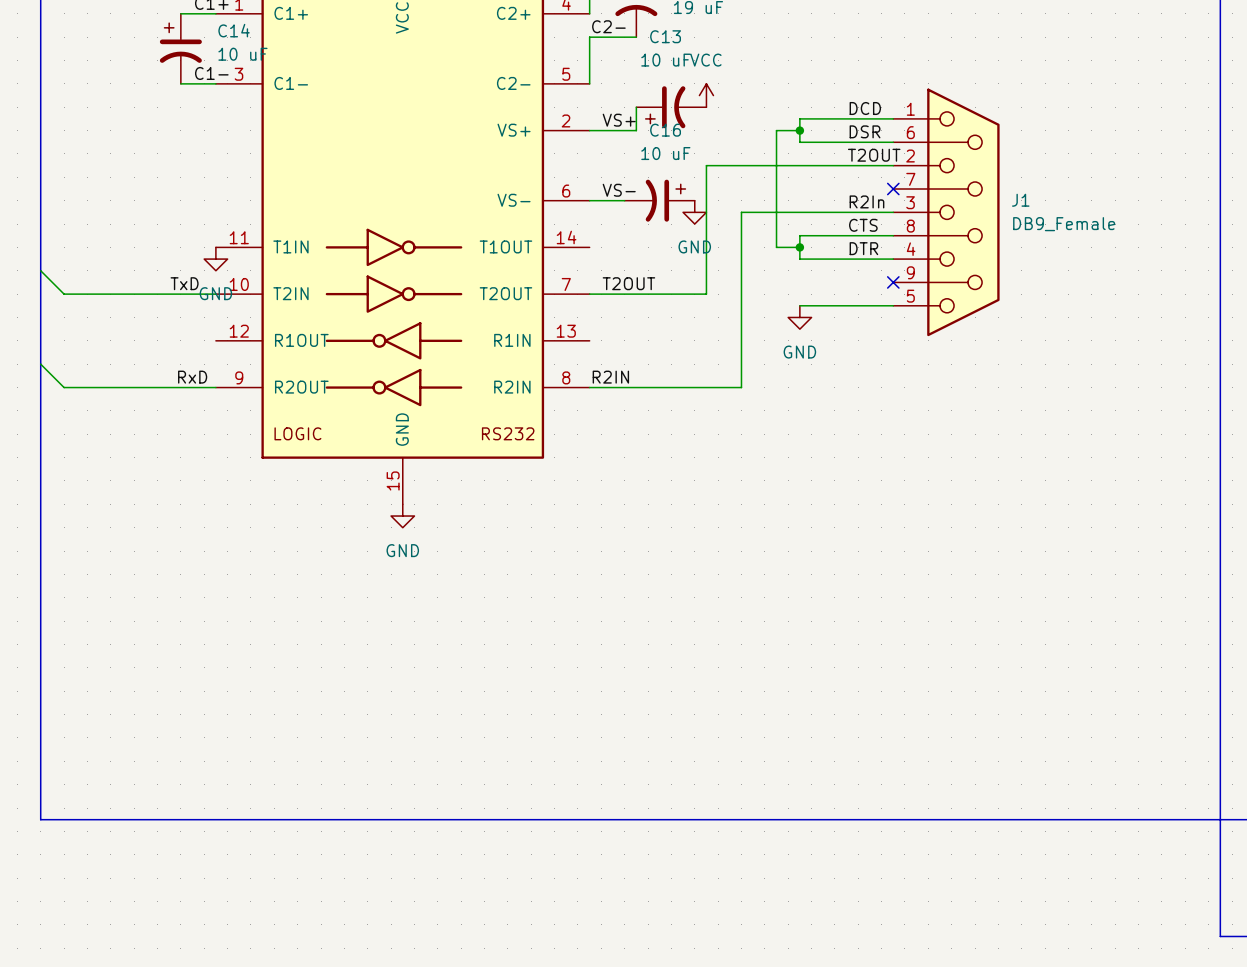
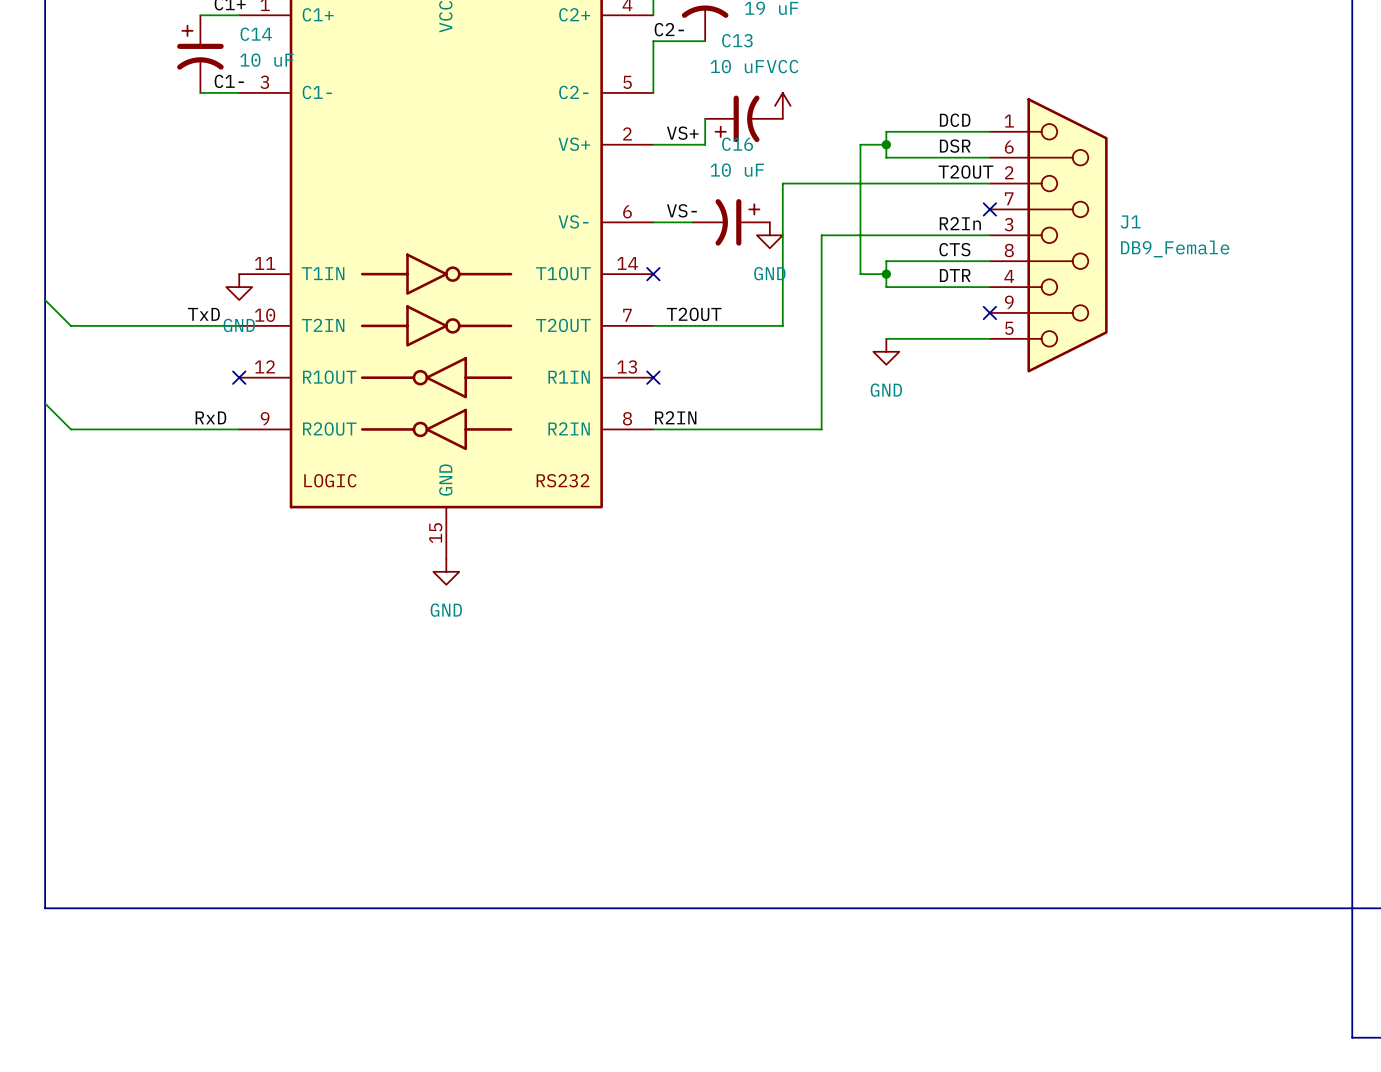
no-connect mark: none -> (653, 274)
no-connect mark: none -> (239, 377)
no-connect mark: none -> (653, 377)

